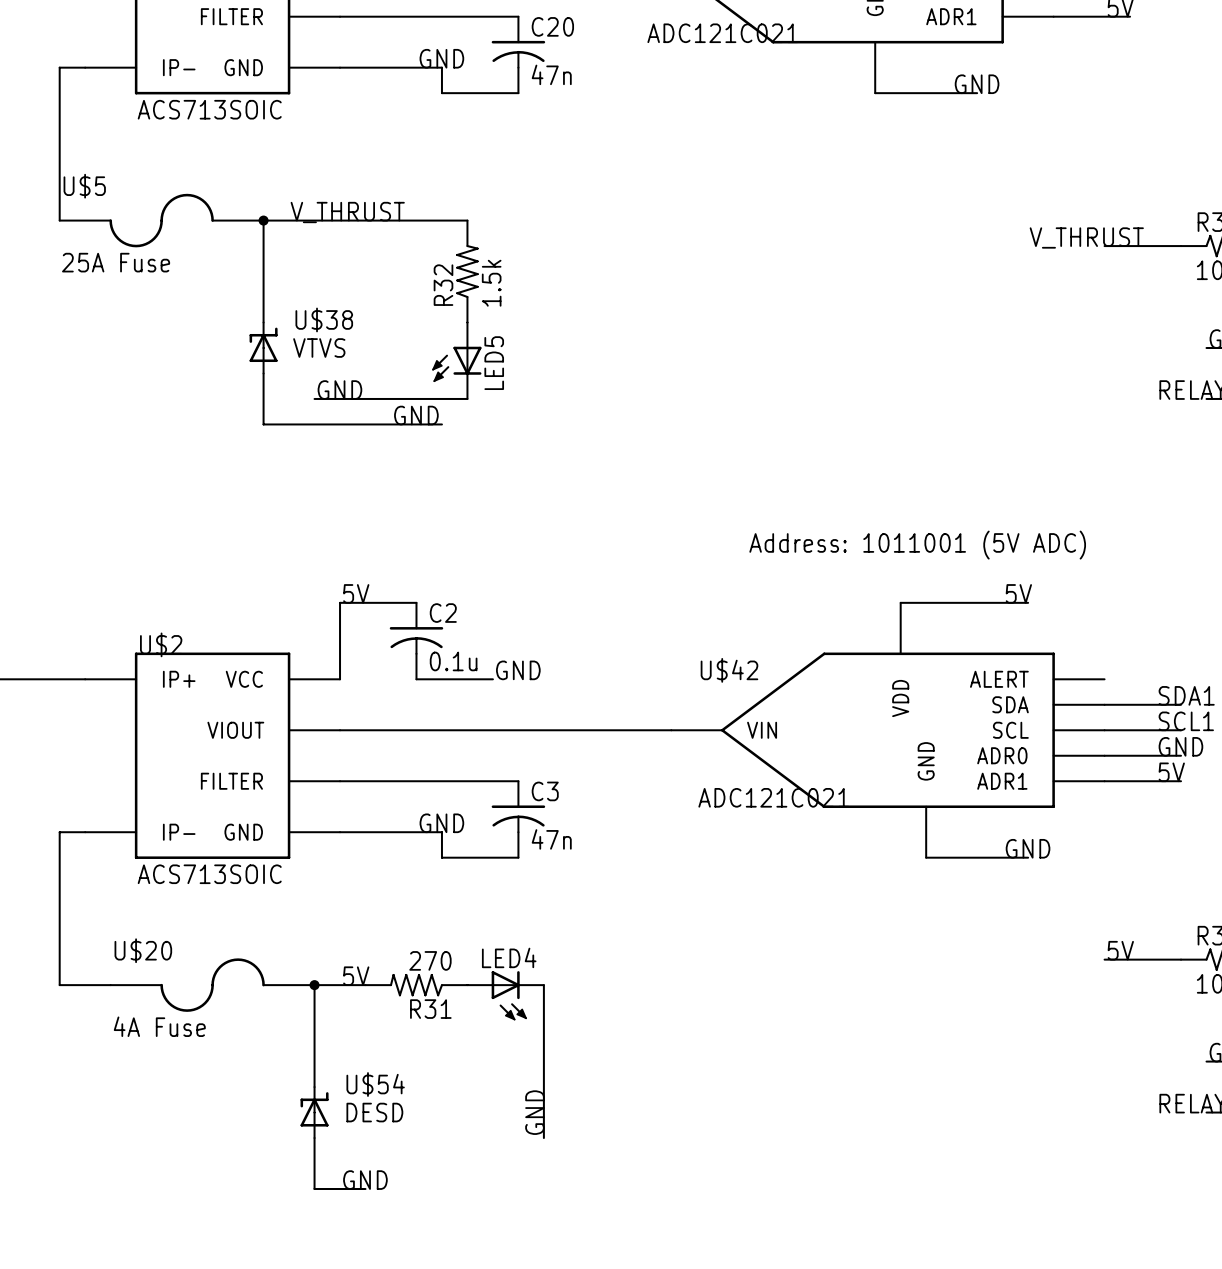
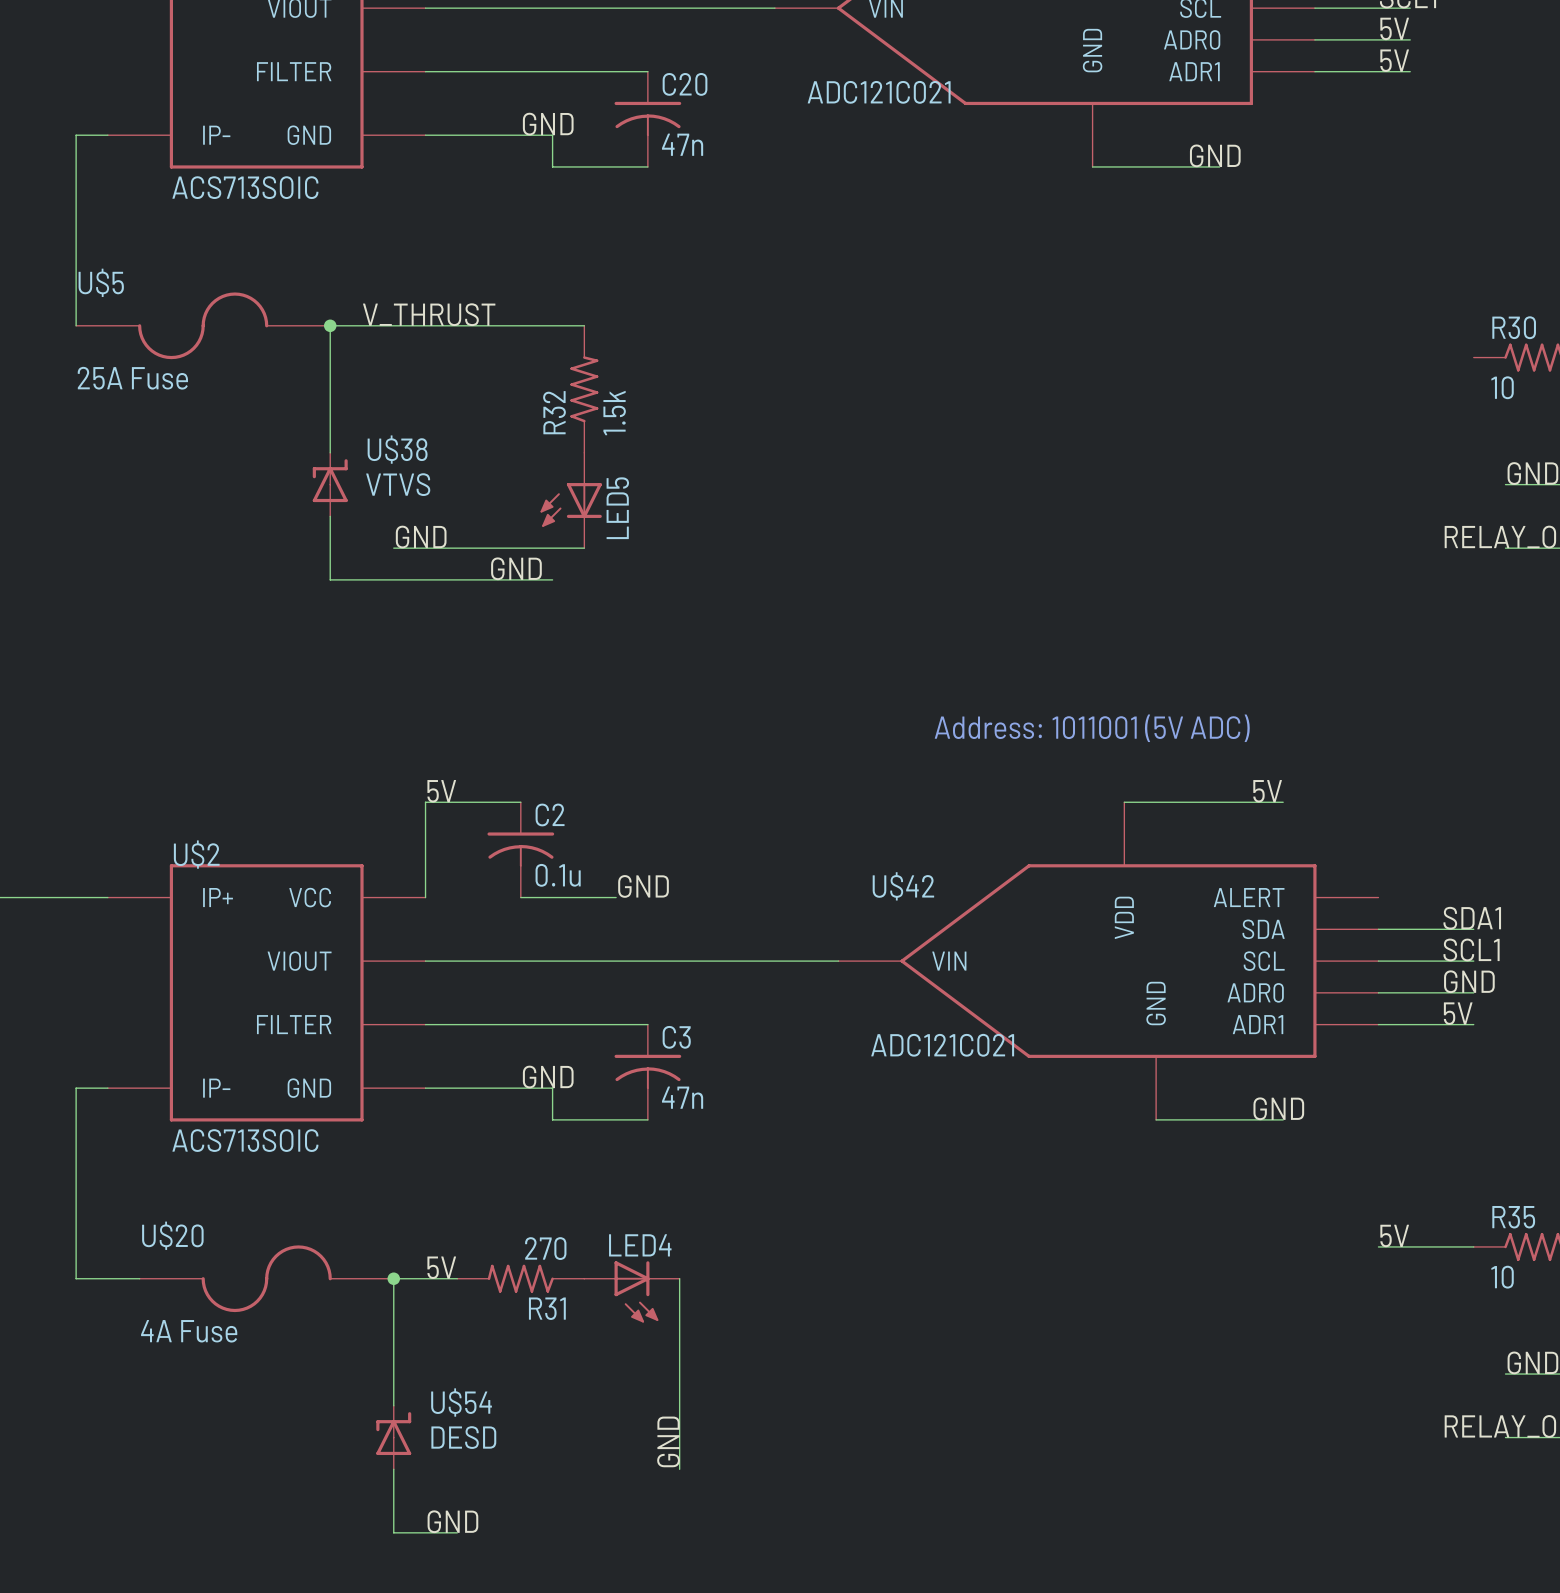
label: V_THRUST (1086, 237) -> none
wire: (1104, 246) (1181, 246) -> none

